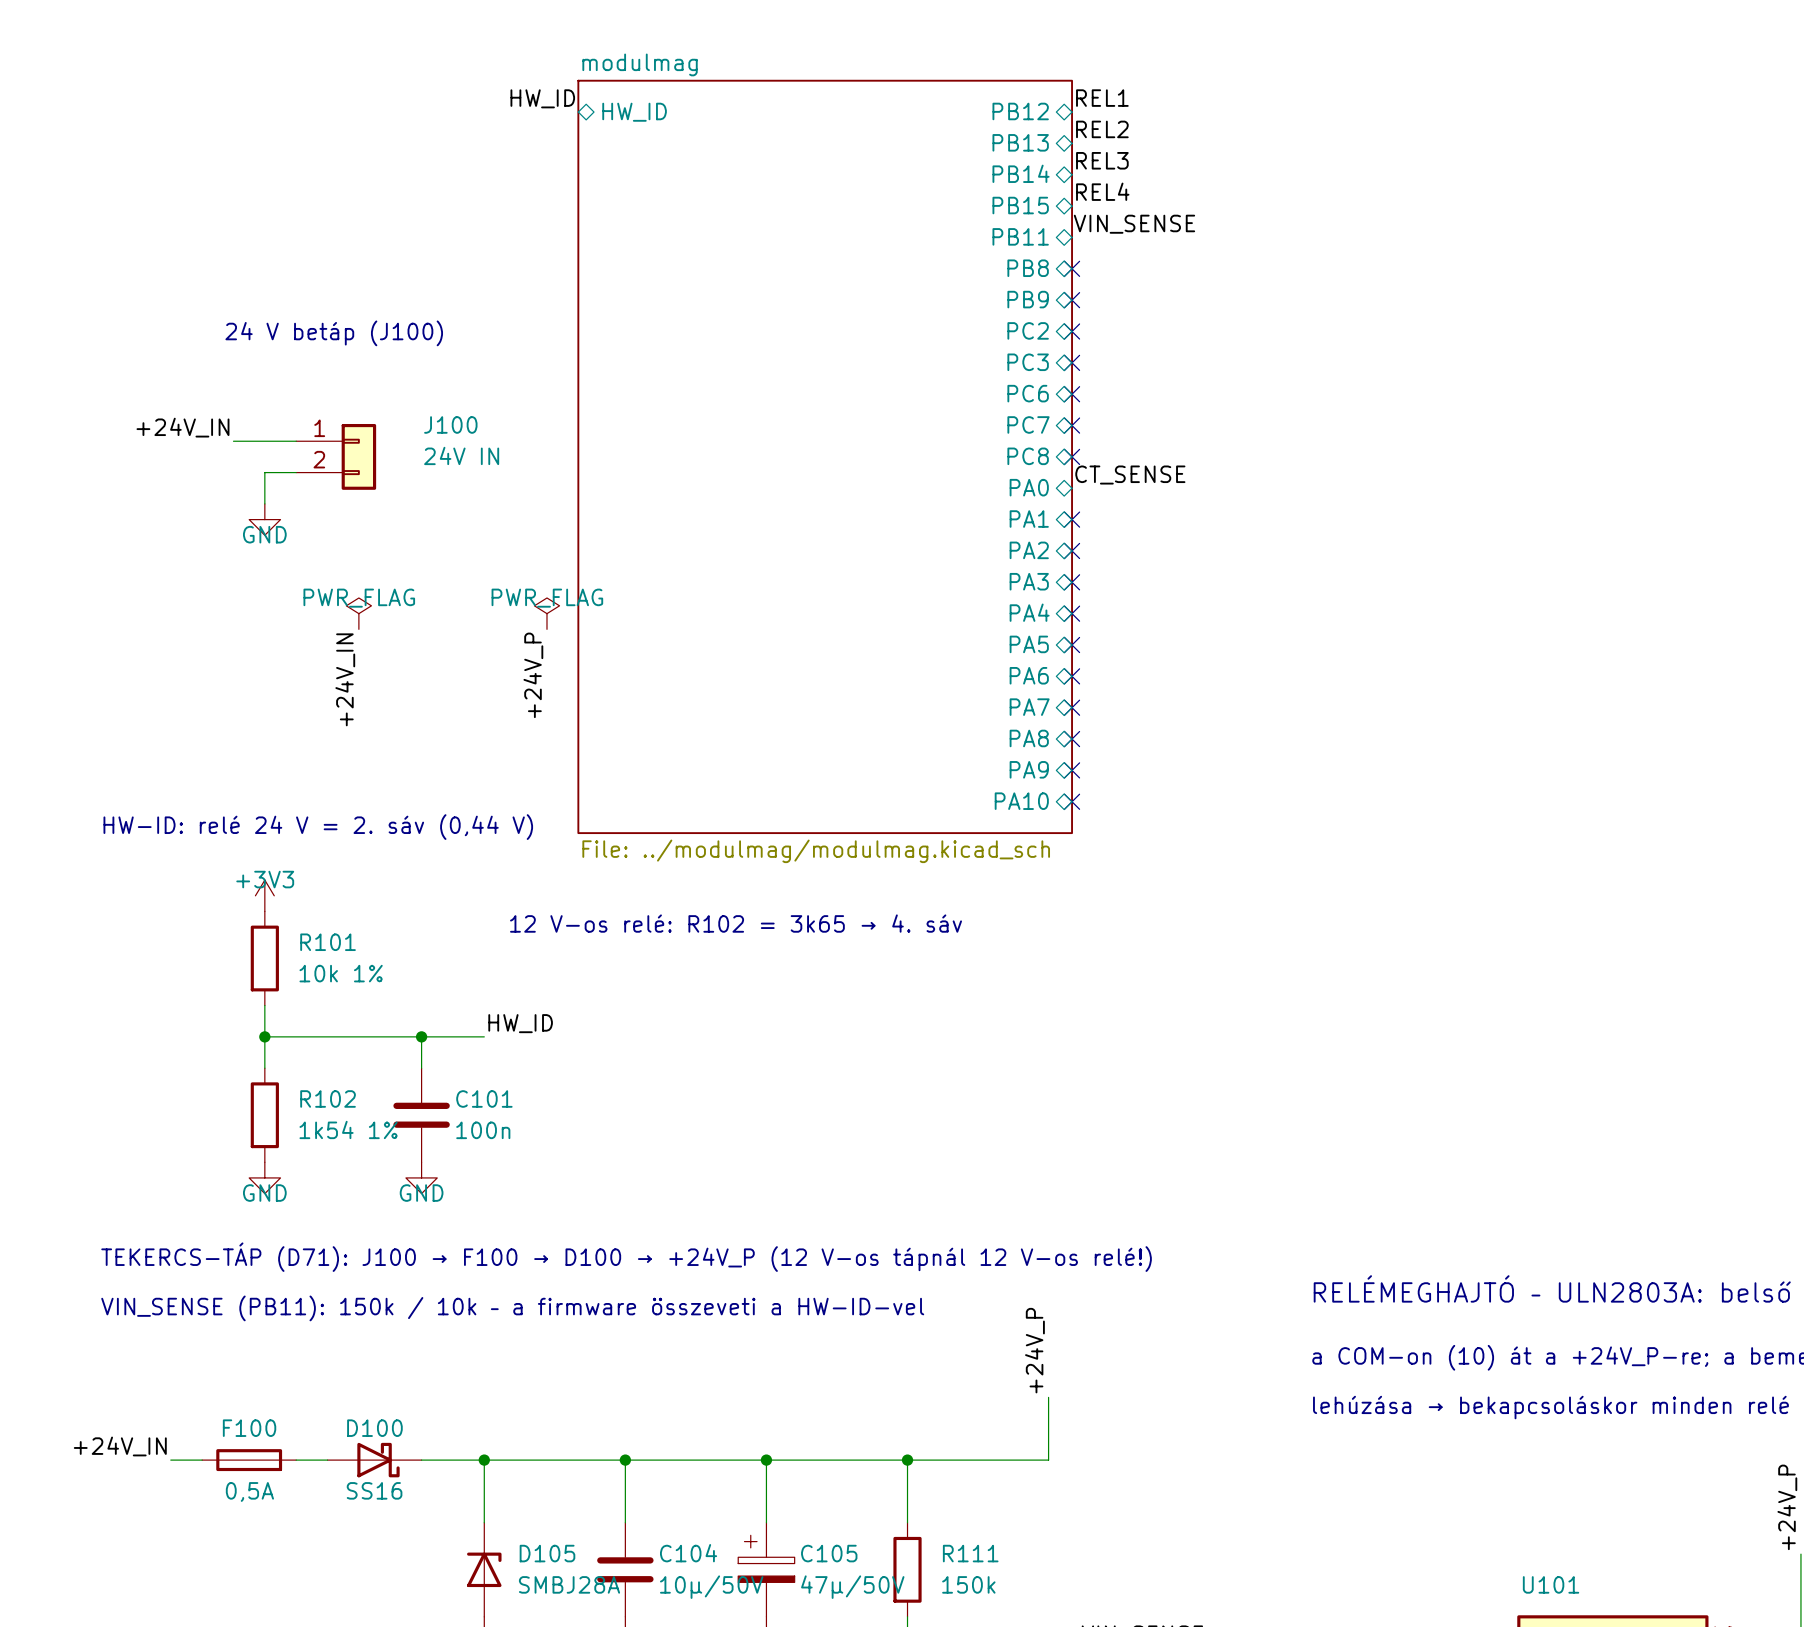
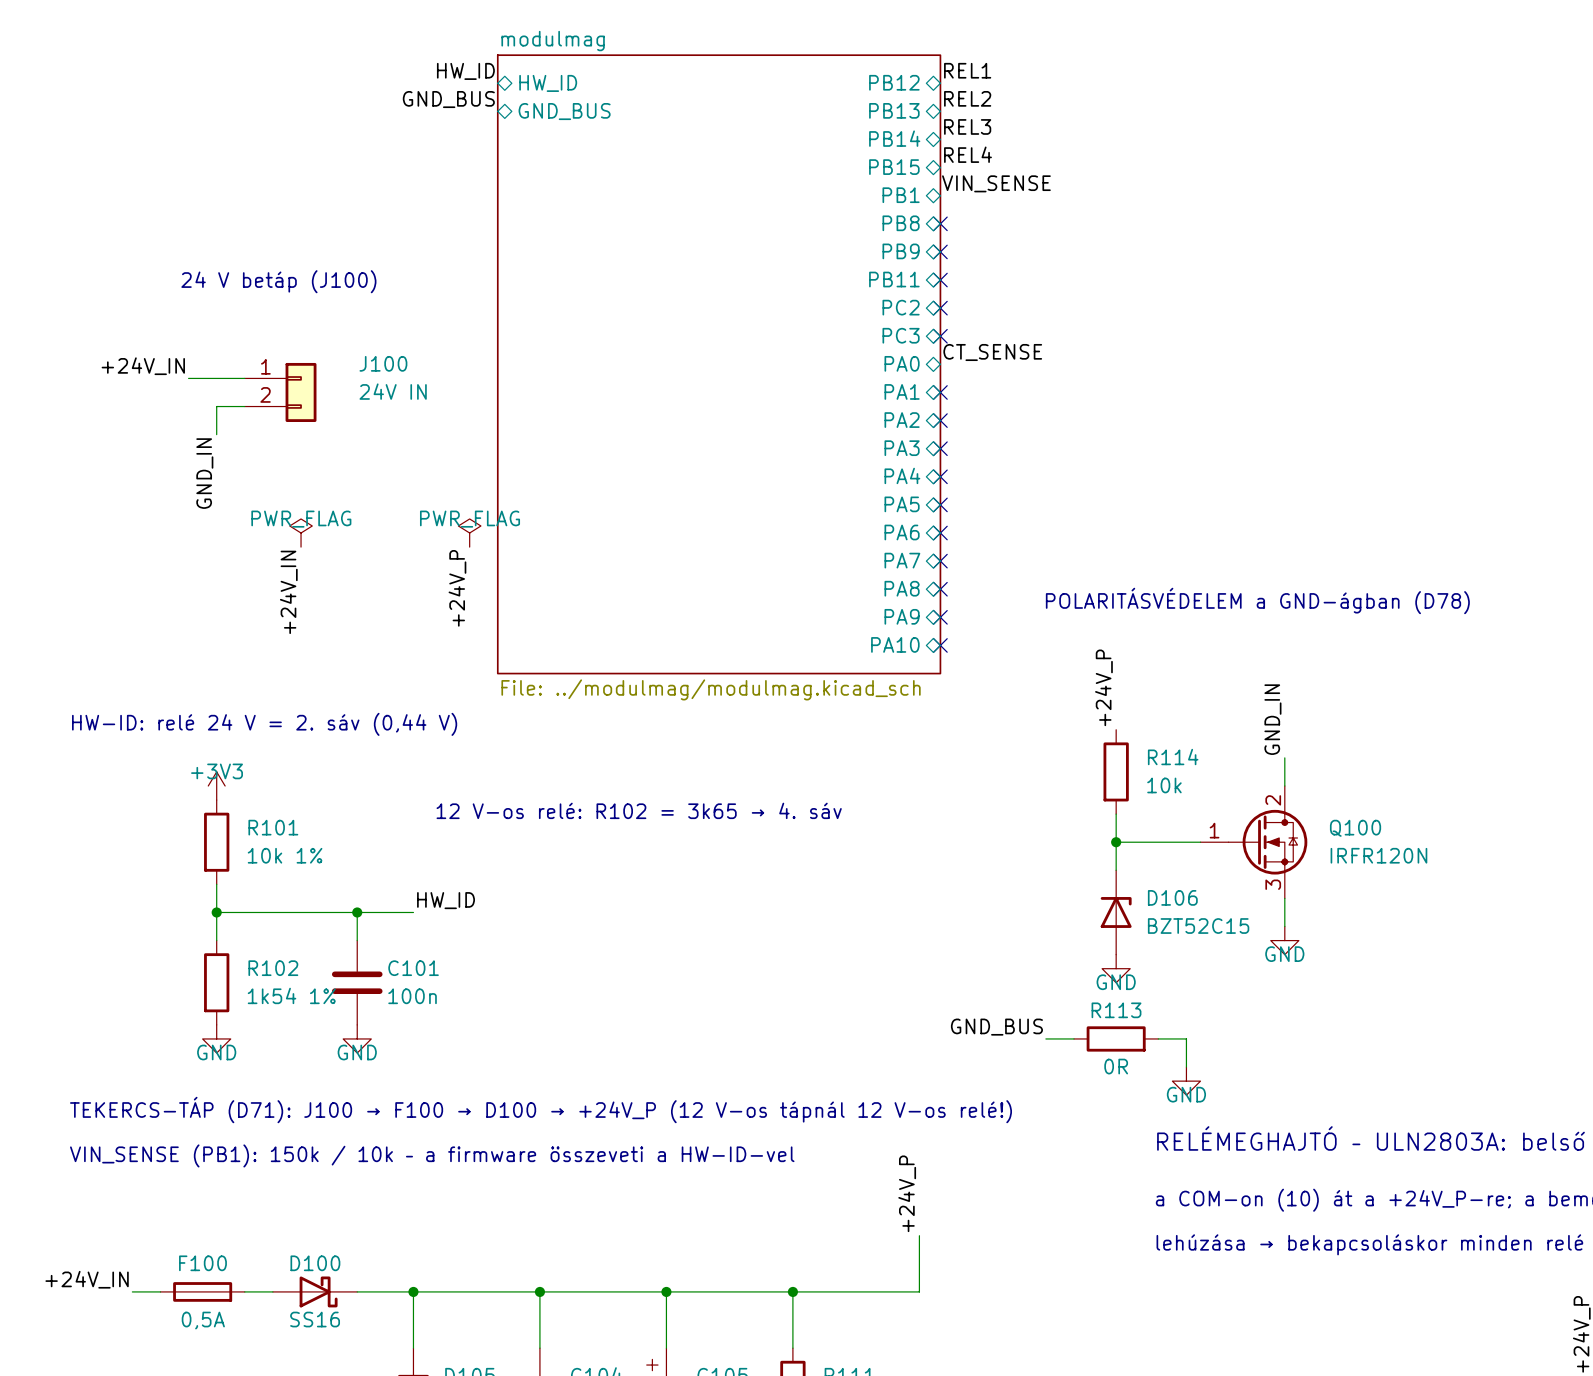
label: none -> GND_BUS (448, 99)
sheet pin: none -> GND_BUS (564, 111)
sheet pin: PB11 (1020, 236) -> PB1 (901, 195)
sheet pin: PC2 (1028, 330) -> PB11 (894, 279)
sheet pin: PC3 (1028, 362) -> PC2 (901, 307)
sheet pin: PC6 (1028, 393) -> PC3 (901, 335)
sheet pin: PC7 (1028, 424) -> PA0 (902, 363)
sheet modulmag: none -> File: ../modulmag/modulmag.kicad_sch (719, 364)
no-connect mark position: (1072, 425) -> (940, 420)
sheet modulmag: File: ../modulmag/modulmag.kicad_sch (825, 456) -> none
sheet pin: PC8 (1028, 456) -> PA1 (902, 391)
label position: CT_SENSE (1130, 475) -> CT_SENSE (992, 352)
sheet pin: PA0 (1029, 487) -> PA2 (902, 420)
power symbol: GND (264, 519) -> none
sheet pin: PA1 (1029, 519) -> PA3 (902, 448)
label: none -> GND_IN (204, 473)
sheet pin: PA2 (1029, 550) -> PA4 (902, 475)
sheet pin: PA3 (1029, 581) -> PA5 (902, 504)
sheet pin: PA4 (1029, 612) -> PA6 (902, 532)
sheet pin: PA5 (1029, 644) -> PA7 (902, 560)
sheet pin: PA6 (1029, 675) -> PA8 (902, 588)
text: none -> POLARITÁSVÉDELEM a GND-ágban (D78) (1257, 600)
sheet pin: PA7 (1029, 707) -> PA9 (902, 616)
sheet pin: PA8 (1029, 738) -> PA10 (895, 644)
sheet pin: PA9 (1029, 769) -> none
no-connect mark: (1072, 770) -> none
label: none -> +24V_P (1103, 687)
sheet pin: PA10 (1021, 801) -> none
no-connect mark: (1072, 801) -> none
label: none -> GND_IN (1272, 719)
wire: none -> (1284, 757) (1284, 785)
R114: none -> 10k (1116, 771)
wire: none -> (1116, 814) (1116, 870)
wire: none -> (1116, 842) (1200, 842)
junction: none -> (1116, 842)
Q100: none -> IRFR120N (1253, 842)
wire: none -> (1284, 898) (1284, 926)
D106: none -> BZT52C15 (1116, 912)
power symbol: none -> GND (1284, 940)
power symbol: none -> GND (1116, 968)
label: none -> GND_BUS (996, 1027)
wire: none -> (1045, 1038) (1074, 1038)
R113: none -> 0R (1116, 1038)
wire: none -> (1158, 1038) (1186, 1038) (1186, 1067)
power symbol: none -> GND (1186, 1081)
text: VIN_SENSE (PB11): 150k / 10k – a firmware összeveti a HW-ID-vel (512, 1308) -> VIN_SENSE (PB1): 150k / 10k – a firmware összeveti a HW-ID-vel (432, 1155)

